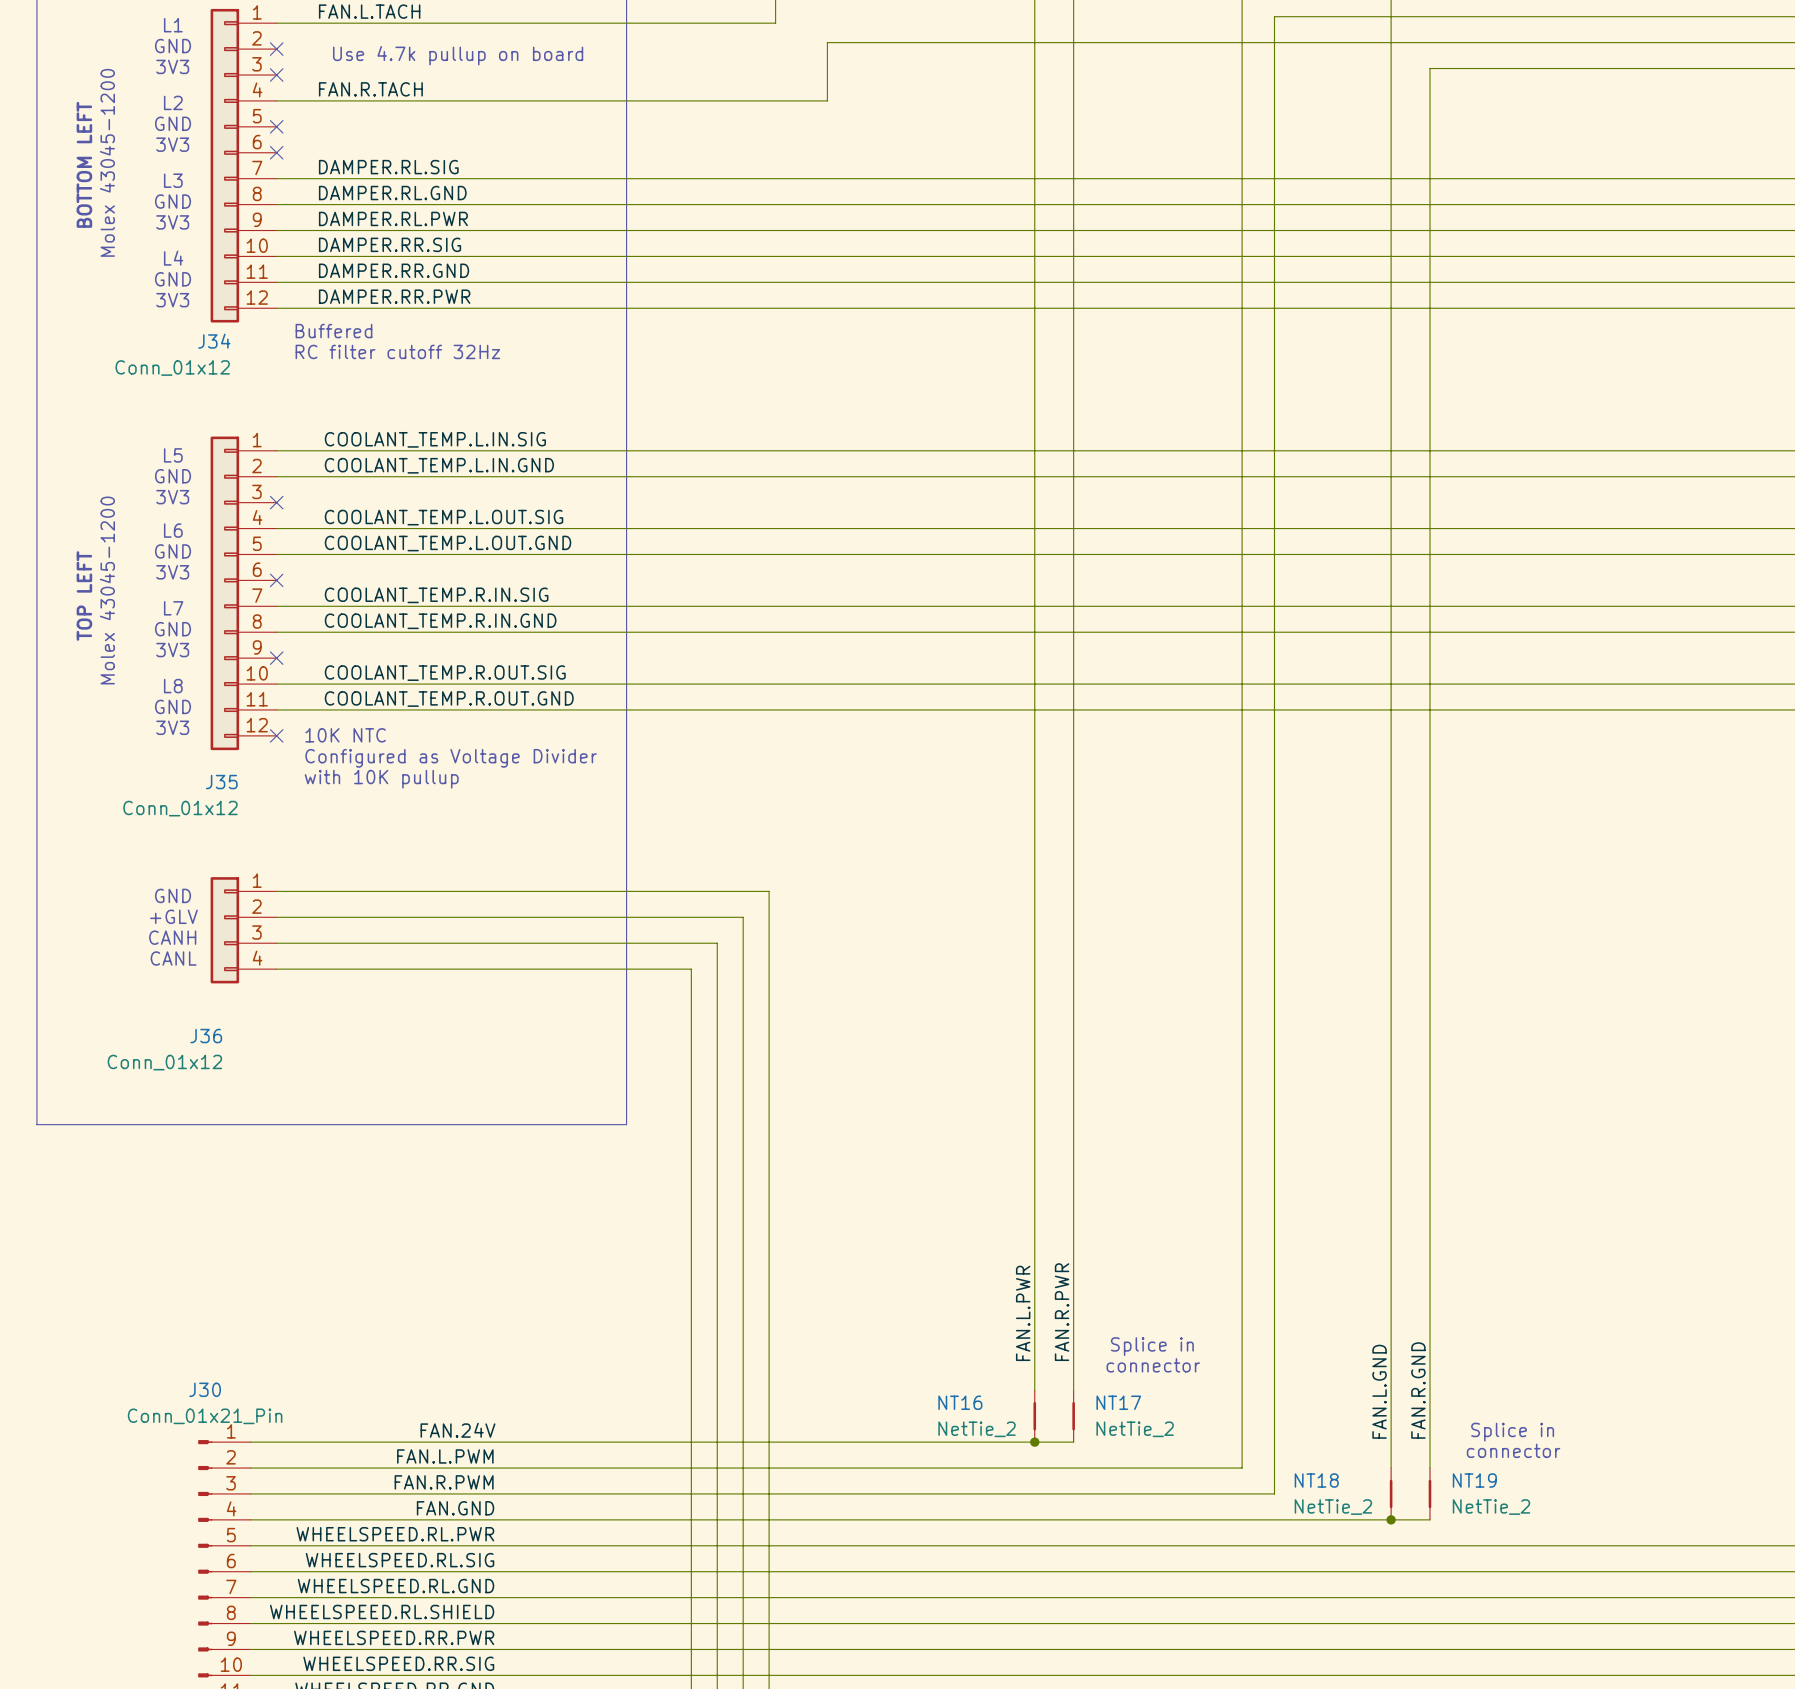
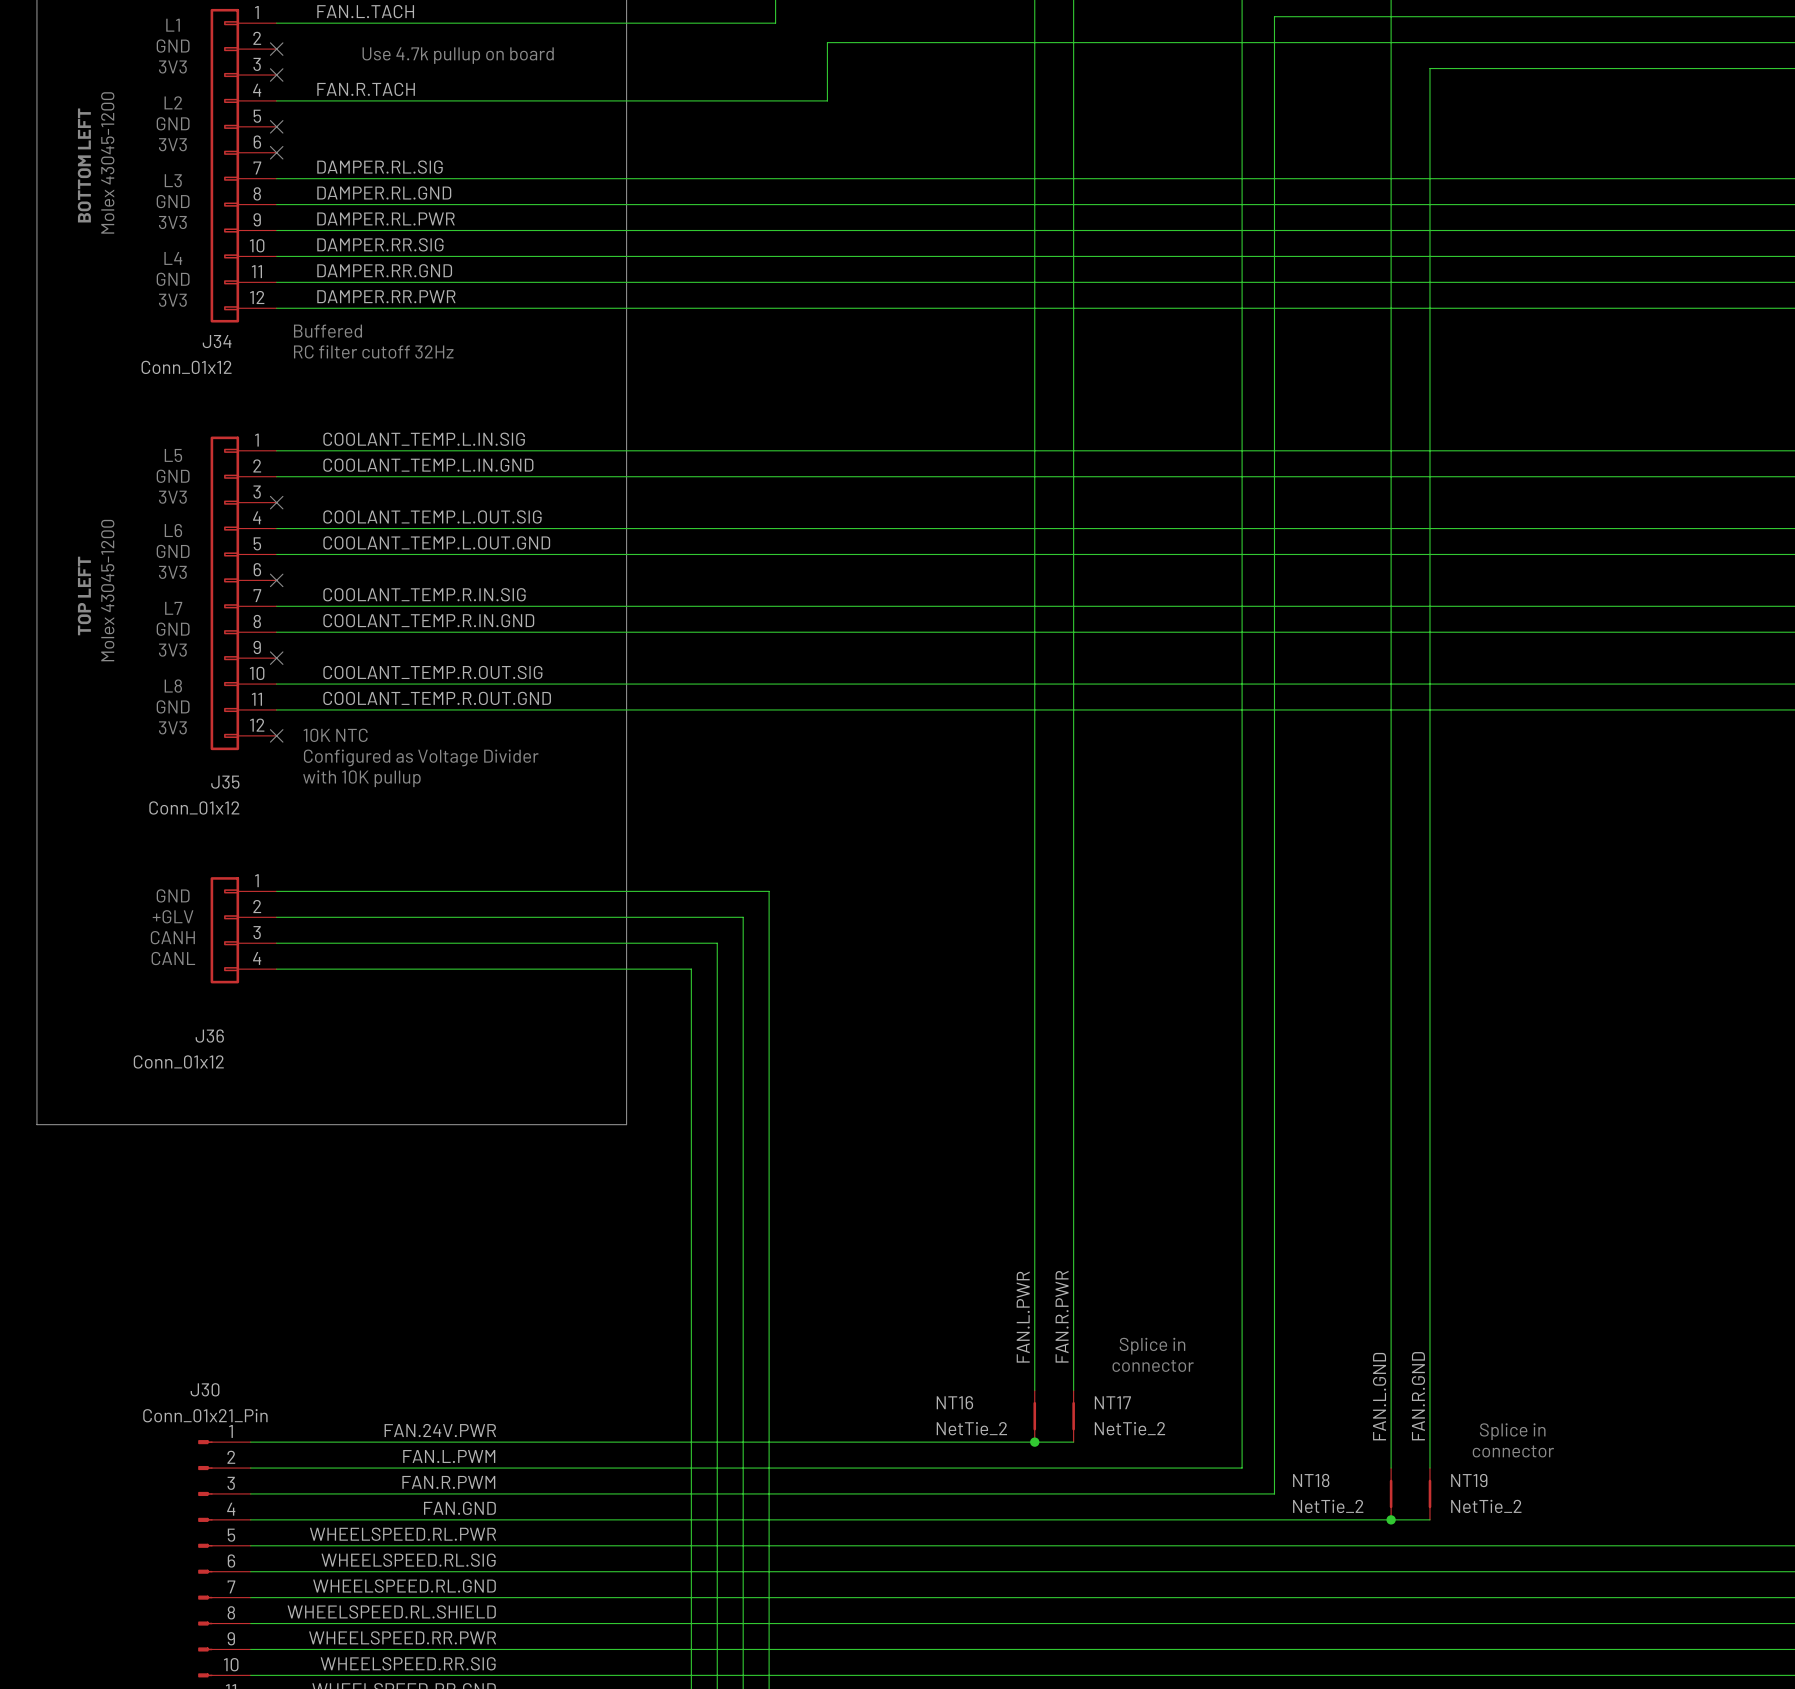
label: FAN.24V (458, 1430) -> FAN.24V.PWR (440, 1430)

